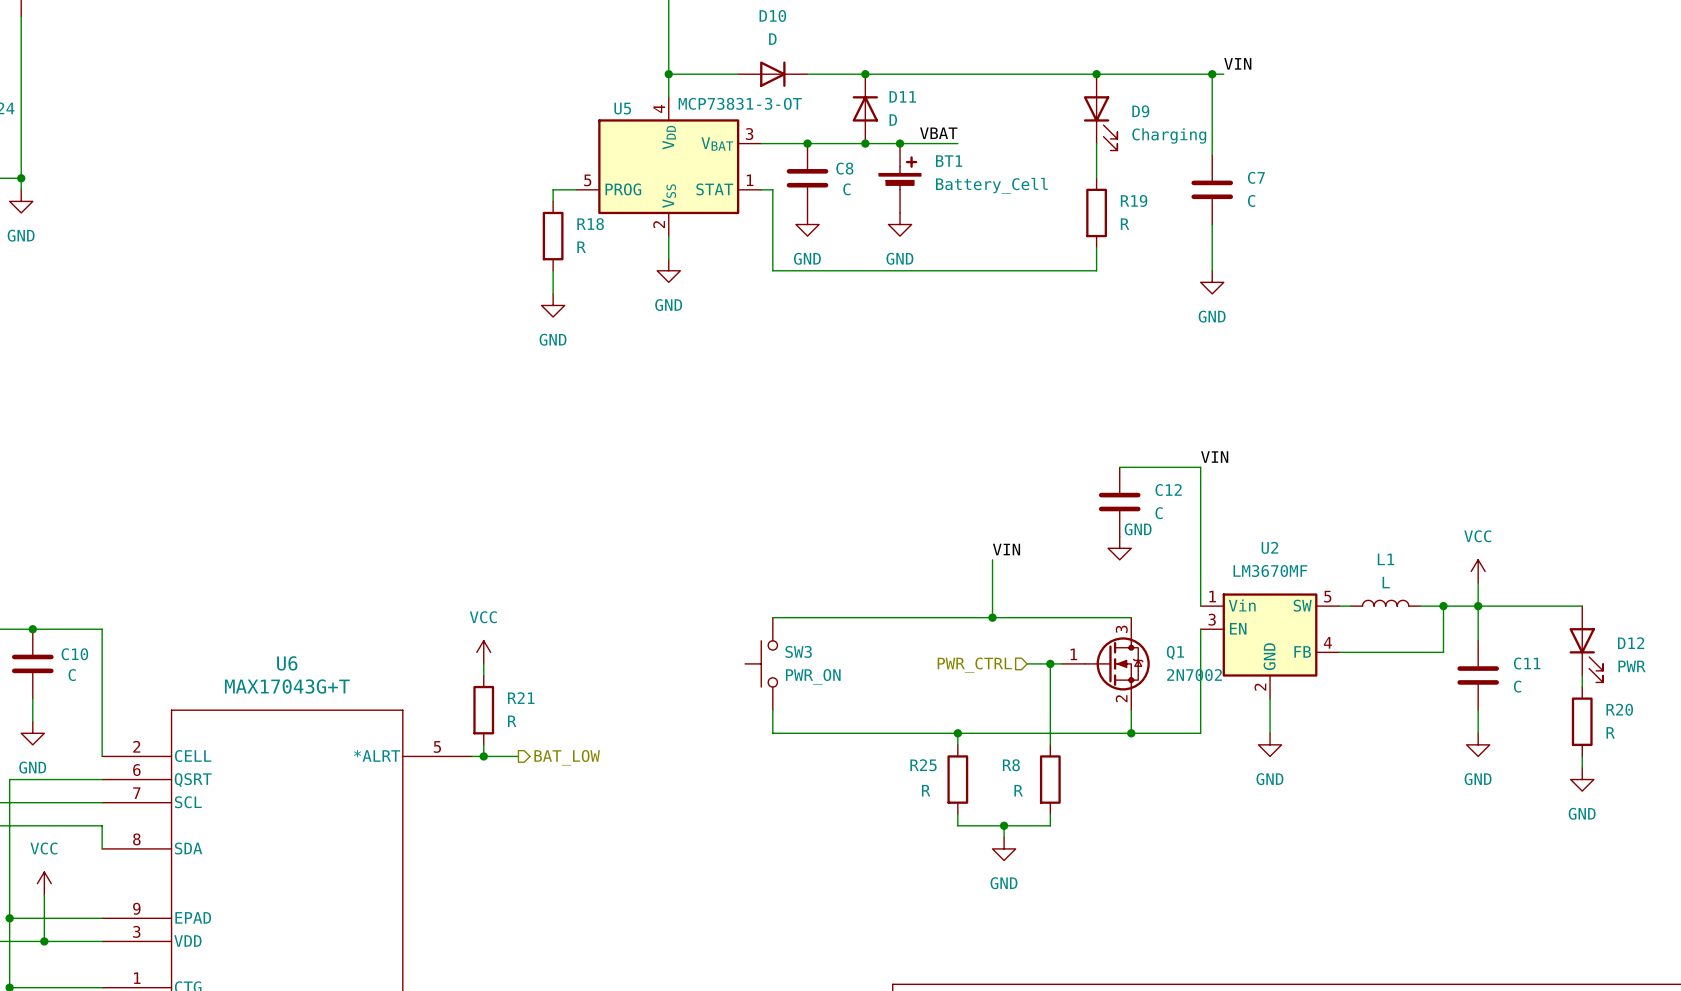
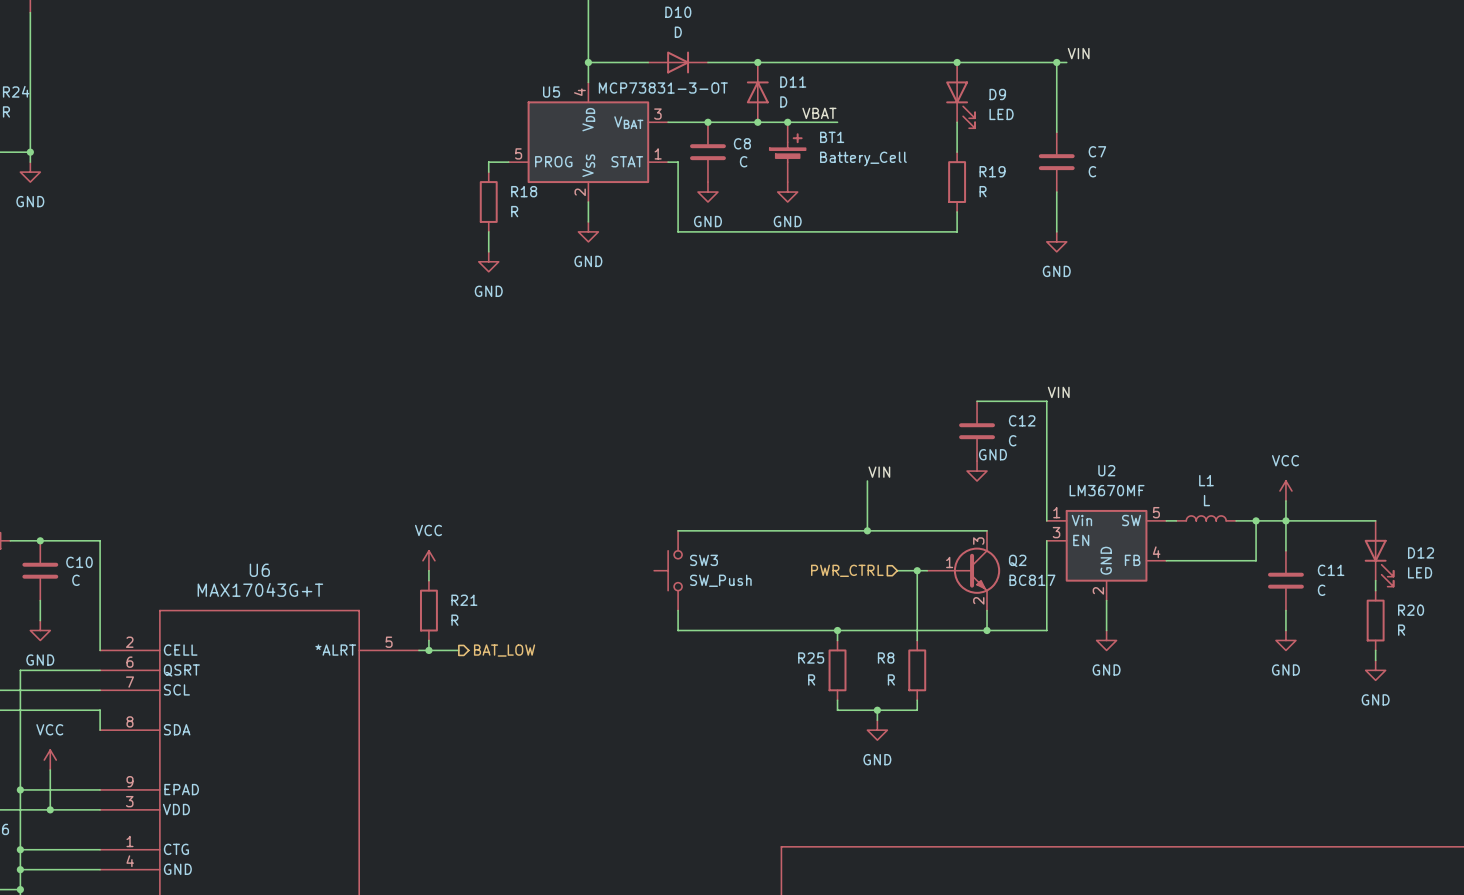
D9 value: Charging (1169, 135) -> LED (1001, 114)
Q2: none -> BC817 (963, 570)
Q1: 2N7002 (1105, 663) -> none
D12 value: PWR (1632, 666) -> LED (1420, 572)
SW3 value: PWR_ON (813, 676) -> SW_Push (720, 580)

